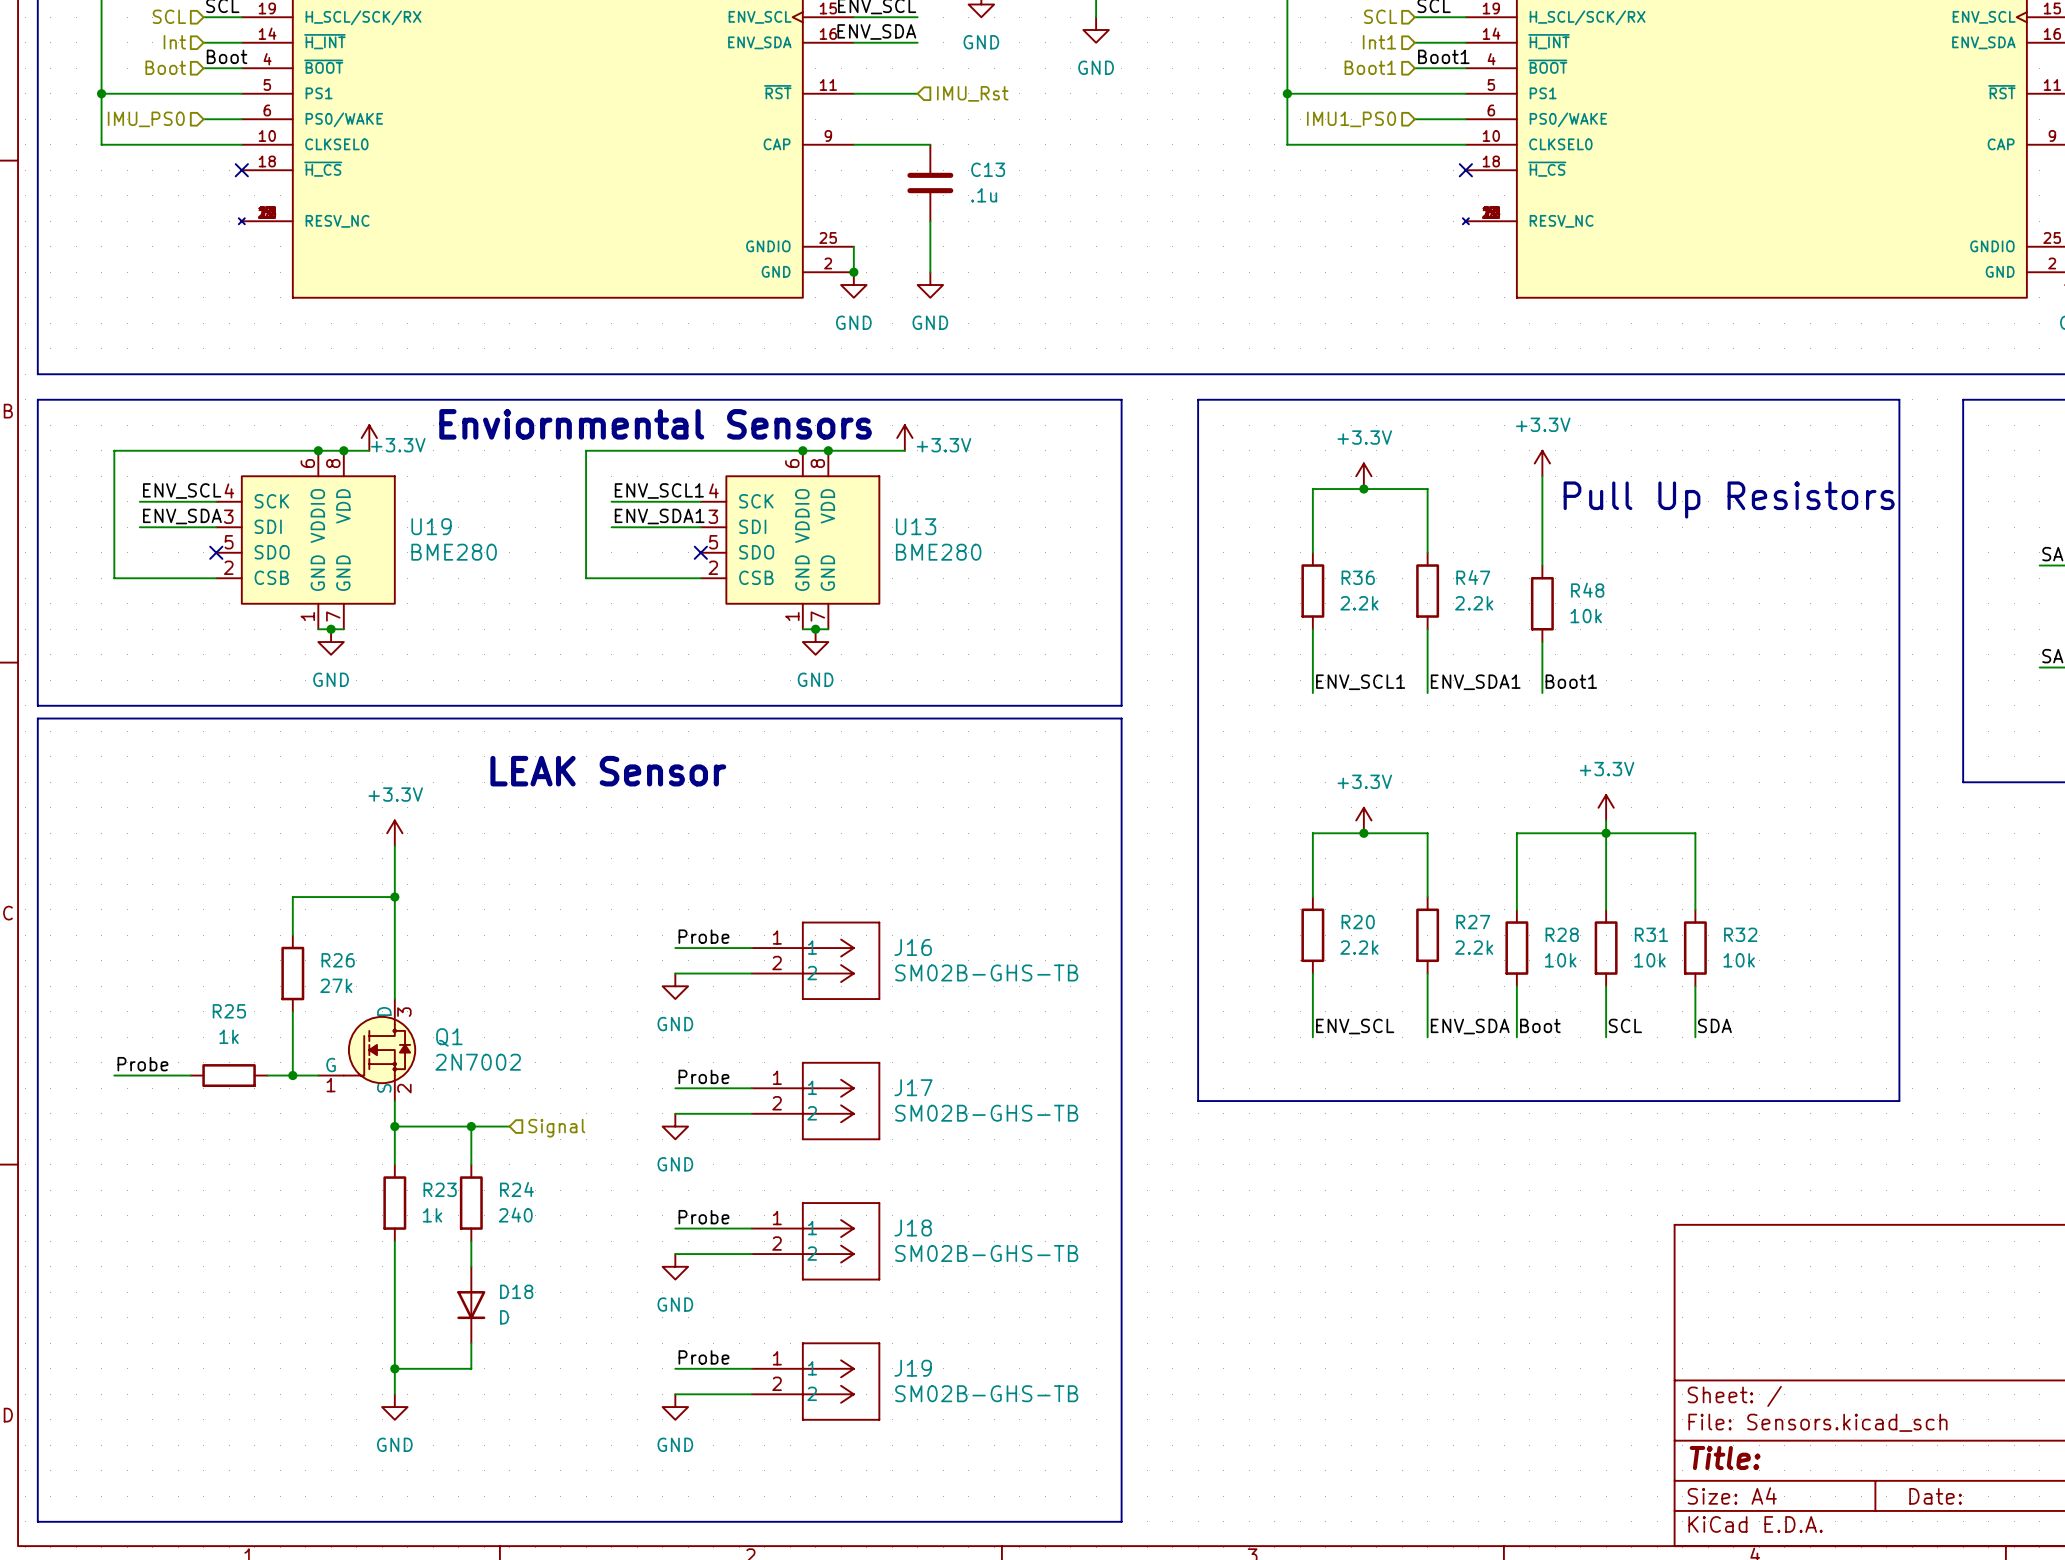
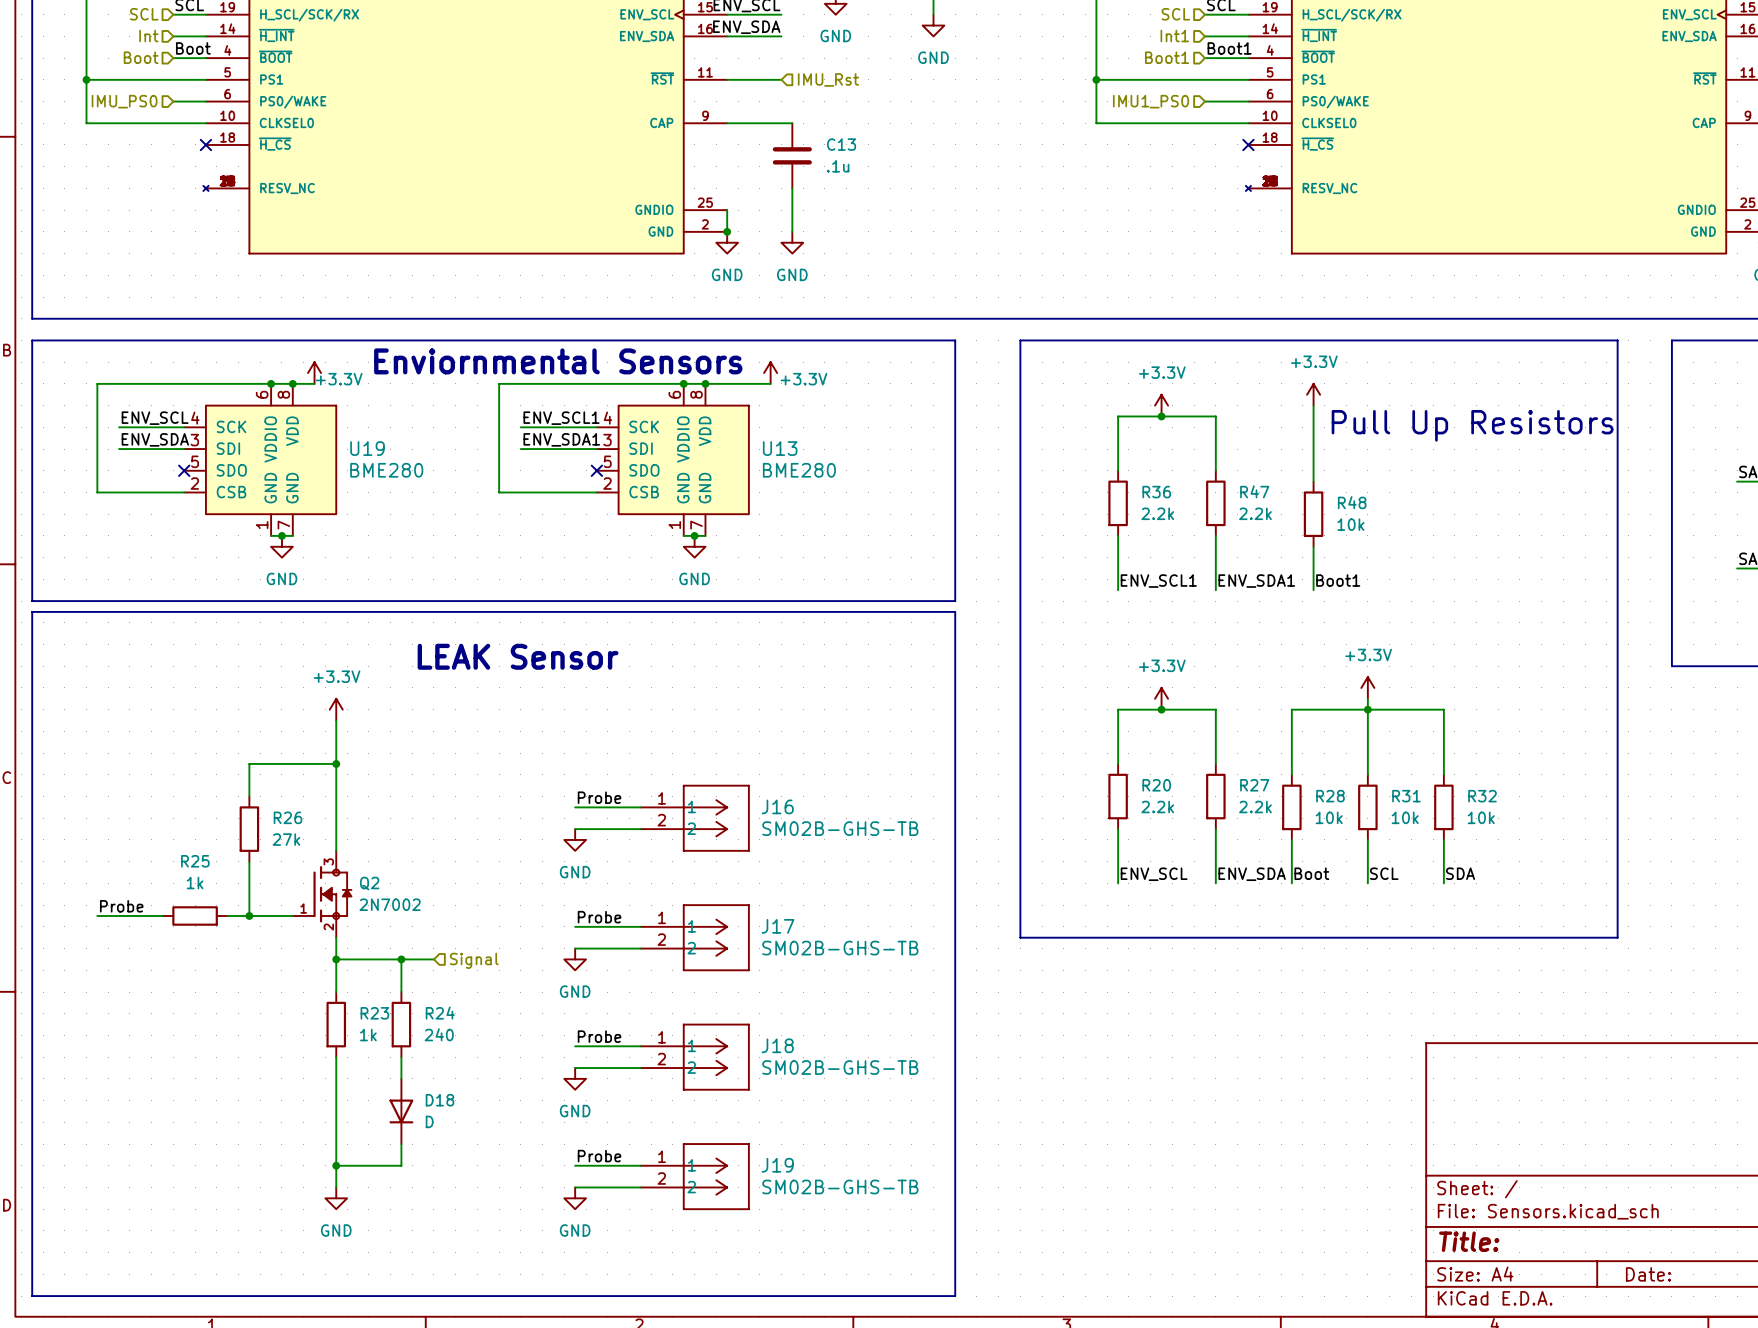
Q1: 2N7002 (366, 1050) -> none
Q2: none -> 2N7002 (322, 894)

